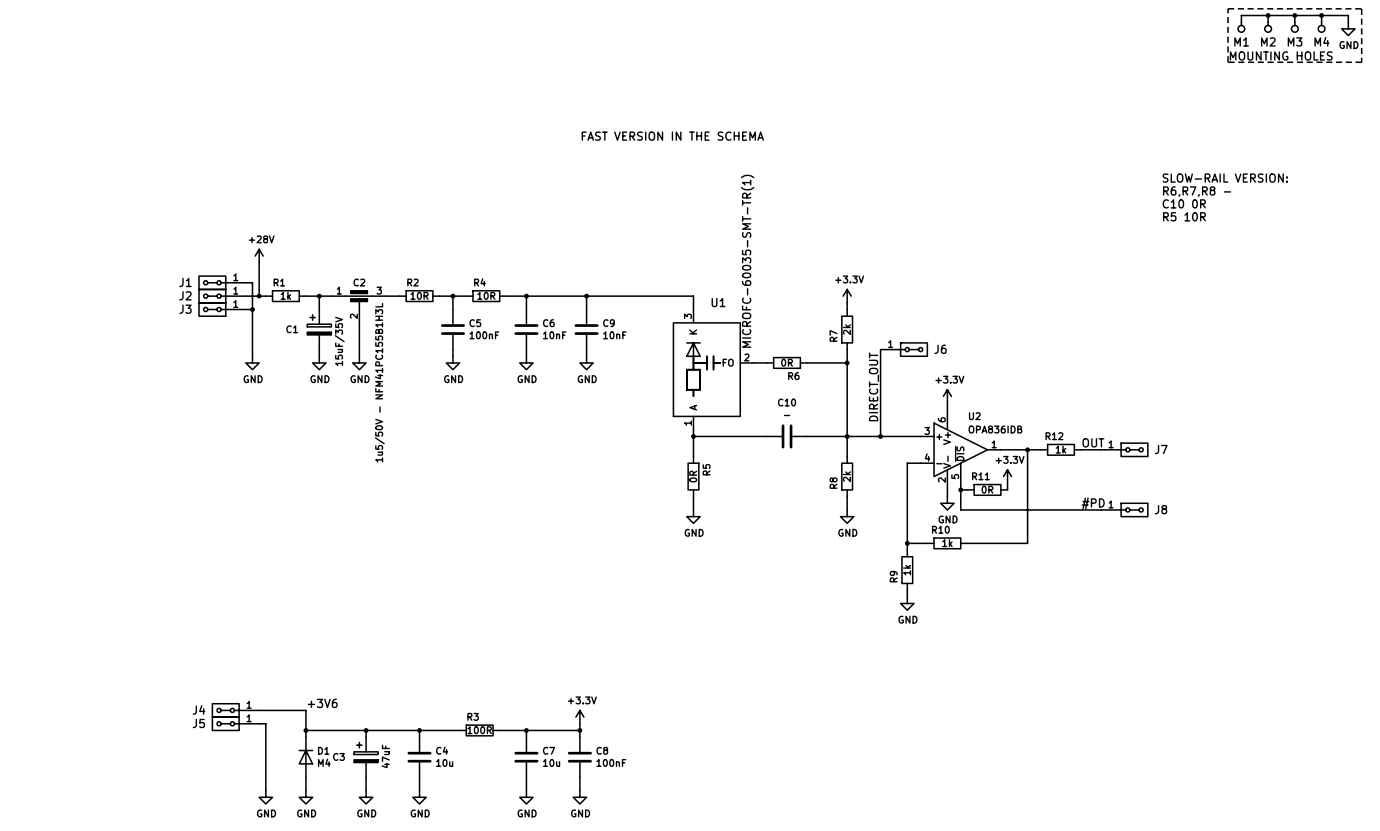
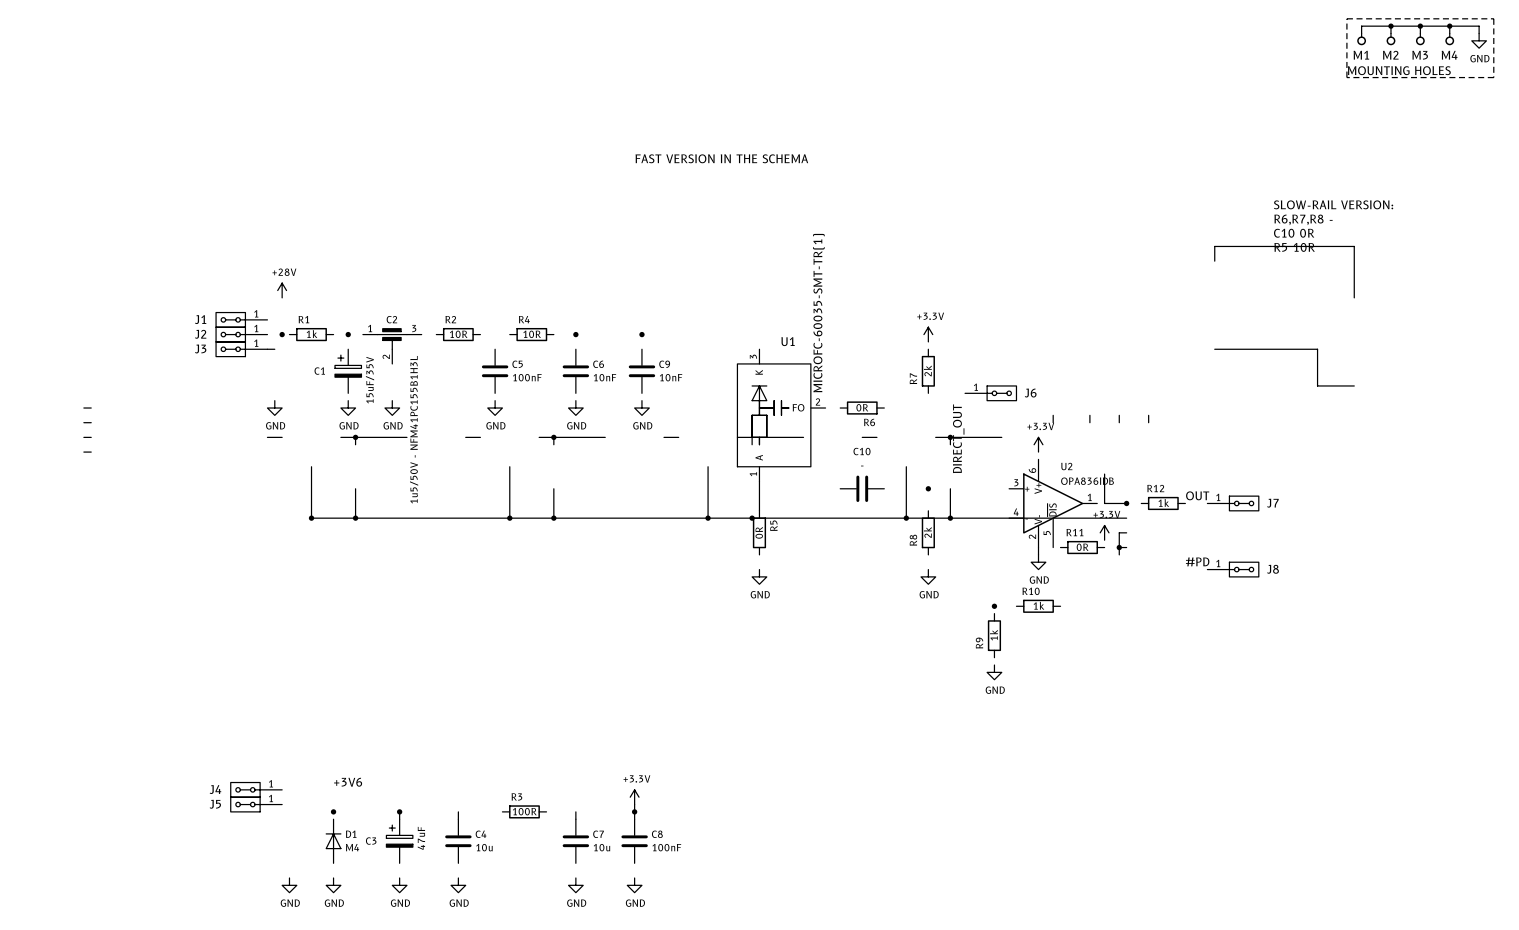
wire: none -> (1214, 261) (1214, 246) (1354, 246) (1354, 297)
wire: (259, 262) (259, 296) -> none
wire: (245, 282) (252, 282) (252, 356) -> none
wire: (245, 296) (265, 296) -> none
wire: (305, 296) (332, 296) -> none
wire: (319, 296) (319, 309) -> none
wire: (386, 296) (399, 296) -> (465, 437) (480, 437)
wire: (439, 296) (466, 296) -> none
wire: (452, 296) (452, 309) -> none
junction: (452, 296) -> none
wire: (506, 296) (693, 296) (693, 309) -> none
wire: (526, 296) (526, 309) -> none
wire: (586, 296) (586, 309) -> none
wire: (847, 302) (847, 309) -> (950, 437) (950, 444)
junction: (252, 309) -> none
wire: none -> (1214, 349) (1317, 349) (1317, 385) (1354, 385)
wire: (359, 322) (359, 356) -> none
wire: (319, 349) (319, 356) -> (355, 437) (355, 444)
wire: (452, 349) (452, 356) -> none
wire: (526, 349) (526, 356) -> (553, 437) (553, 444)
wire: (586, 349) (586, 356) -> (752, 437) (752, 444)
wire: (847, 349) (847, 456) -> none
wire: (880, 349) (880, 436) -> none
wire: none -> (83, 408) (91, 408)
wire: (753, 362) (766, 362) -> (862, 437) (876, 437)
wire: (807, 362) (847, 362) -> none
junction: (847, 362) -> none
wire: none -> (1119, 415) (1119, 422)
wire: none -> (1148, 415) (1148, 422)
wire: none -> (83, 422) (91, 422)
wire: none -> (83, 437) (91, 437)
wire: none -> (267, 437) (282, 437)
wire: none -> (340, 437) (406, 437)
junction: none -> (355, 437)
wire: none -> (539, 437) (605, 437)
junction: none -> (553, 437)
wire: none -> (663, 437) (678, 437)
wire: none -> (737, 437) (803, 437)
wire: none -> (935, 437) (1001, 437)
junction: none -> (950, 437)
wire: none -> (83, 452) (91, 452)
wire: (947, 403) (947, 409) -> (1053, 415) (1053, 422)
wire: none -> (509, 466) (509, 518)
wire: none -> (708, 466) (708, 518)
wire: none -> (906, 466) (906, 518)
wire: none -> (355, 488) (355, 518)
wire: none -> (553, 488) (553, 518)
wire: (693, 436) (766, 436) -> none
junction: (693, 436) -> none
wire: (807, 436) (920, 436) -> none
wire: none -> (950, 488) (950, 518)
junction: (880, 436) -> none
wire: (1000, 449) (1007, 449) -> (1104, 474) (1104, 503)
wire: (1040, 449) (1027, 449) (1027, 543) (967, 543) -> none
wire: (1081, 449) (1101, 449) -> none
junction: none -> (311, 518)
junction: none -> (355, 518)
junction: none -> (509, 518)
junction: none -> (553, 518)
junction: none -> (708, 518)
junction: none -> (752, 518)
junction: none -> (906, 518)
junction: none -> (950, 518)
wire: (907, 463) (907, 550) -> (994, 518) (311, 518) (311, 466)
wire: none -> (1009, 518) (1126, 518)
wire: none -> (1126, 532) (1119, 532) (1119, 554)
wire: (1007, 483) (1007, 489) -> (1089, 415) (1089, 422)
junction: (960, 489) -> none
wire: (967, 489) (960, 489) (960, 509) (1101, 509) -> none
wire: none -> (1119, 547) (1126, 547)
junction: none -> (1119, 547)
wire: (693, 496) (693, 509) -> none
wire: (847, 496) (847, 509) -> none
wire: (907, 543) (927, 543) -> none
wire: (907, 590) (907, 596) -> none
wire: (259, 710) (305, 710) (305, 737) -> none
wire: (259, 723) (265, 723) (265, 790) -> none
wire: (305, 730) (459, 730) -> none
junction: (419, 730) -> none
wire: (499, 730) (579, 730) -> none
junction: (526, 730) -> none
wire: (305, 777) (305, 790) -> none
wire: (366, 777) (366, 790) -> none
wire: (419, 777) (419, 790) -> none
wire: (526, 777) (526, 790) -> none
wire: (579, 777) (579, 790) -> none

